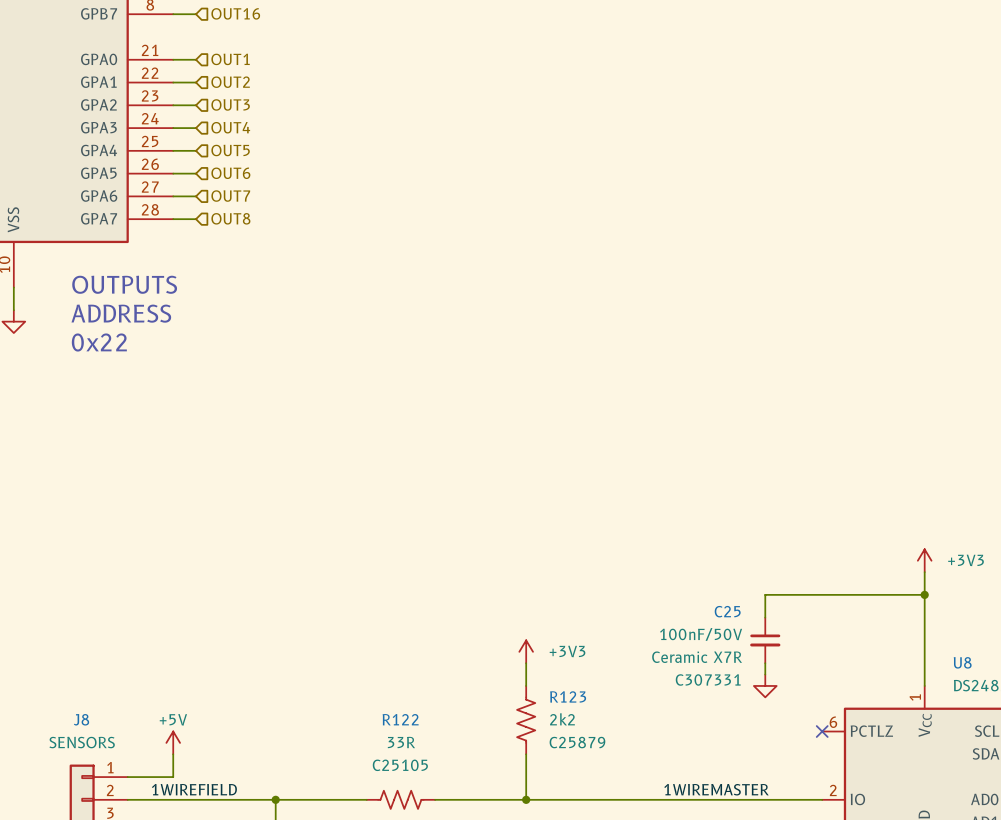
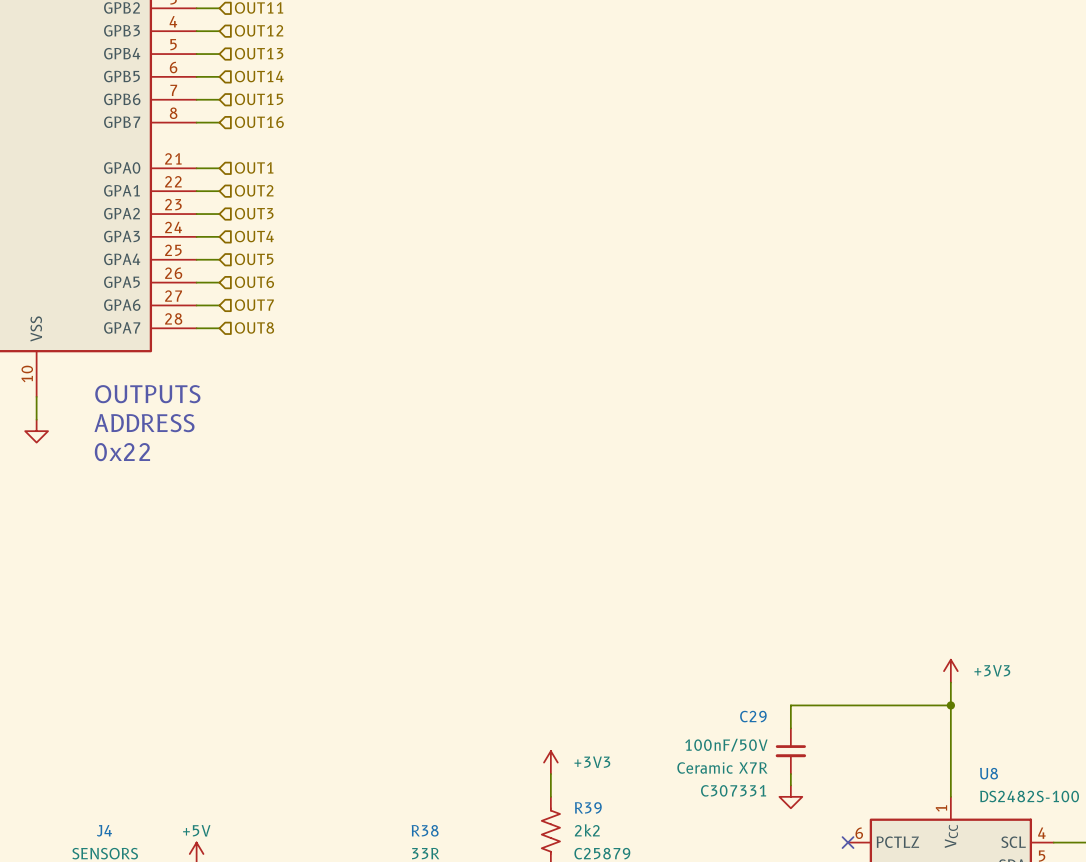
C25 name: C25 (727, 611) -> C29 (753, 716)
R123 name: R123 (568, 696) -> R39 (588, 807)
J8 name: J8 (81, 719) -> J4 (104, 830)
R122 name: R122 (400, 719) -> R38 (425, 830)

